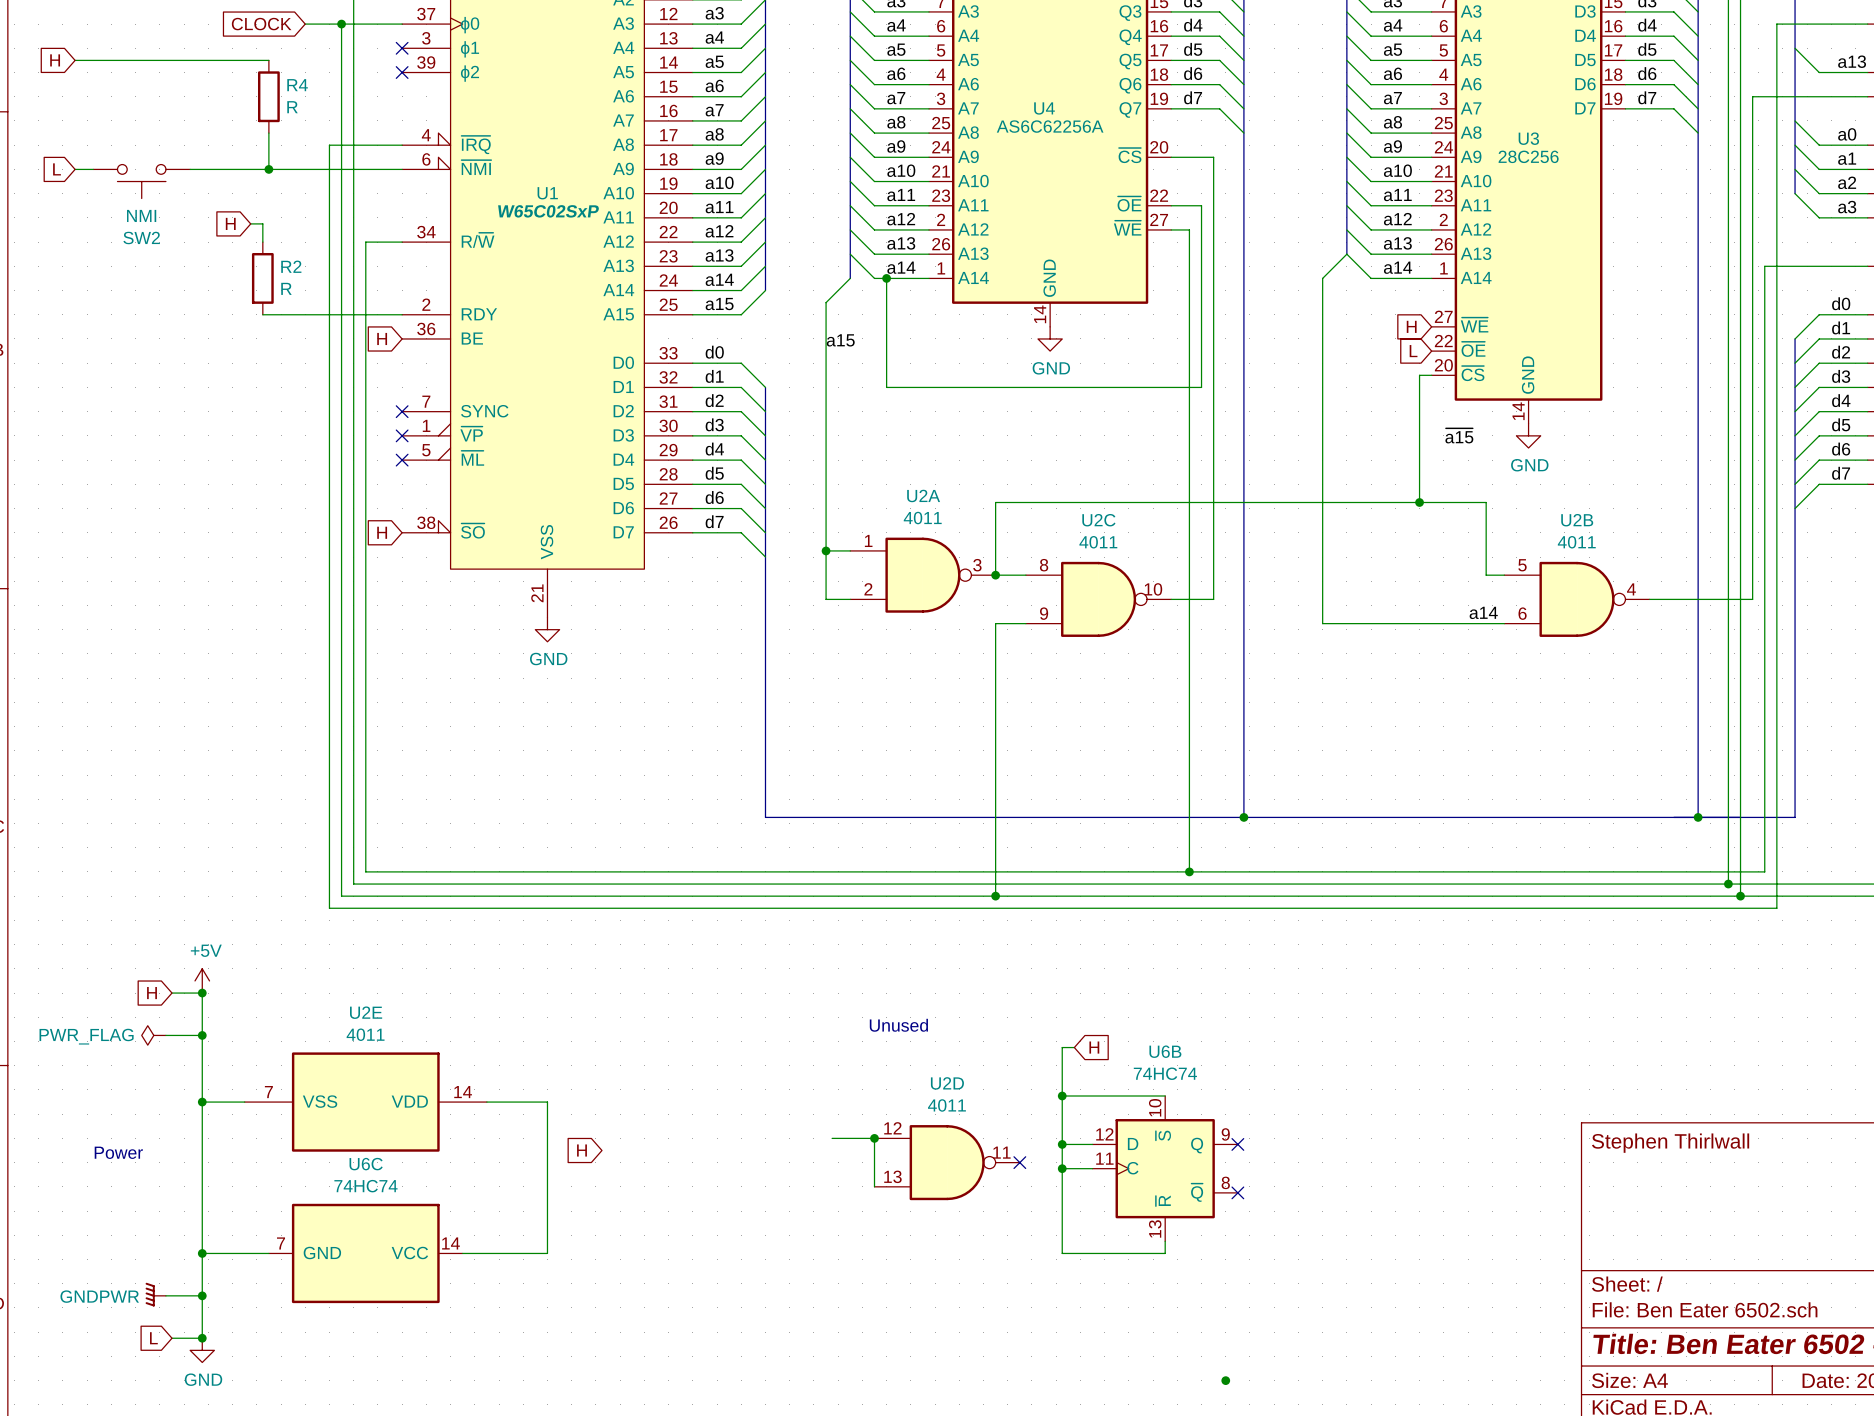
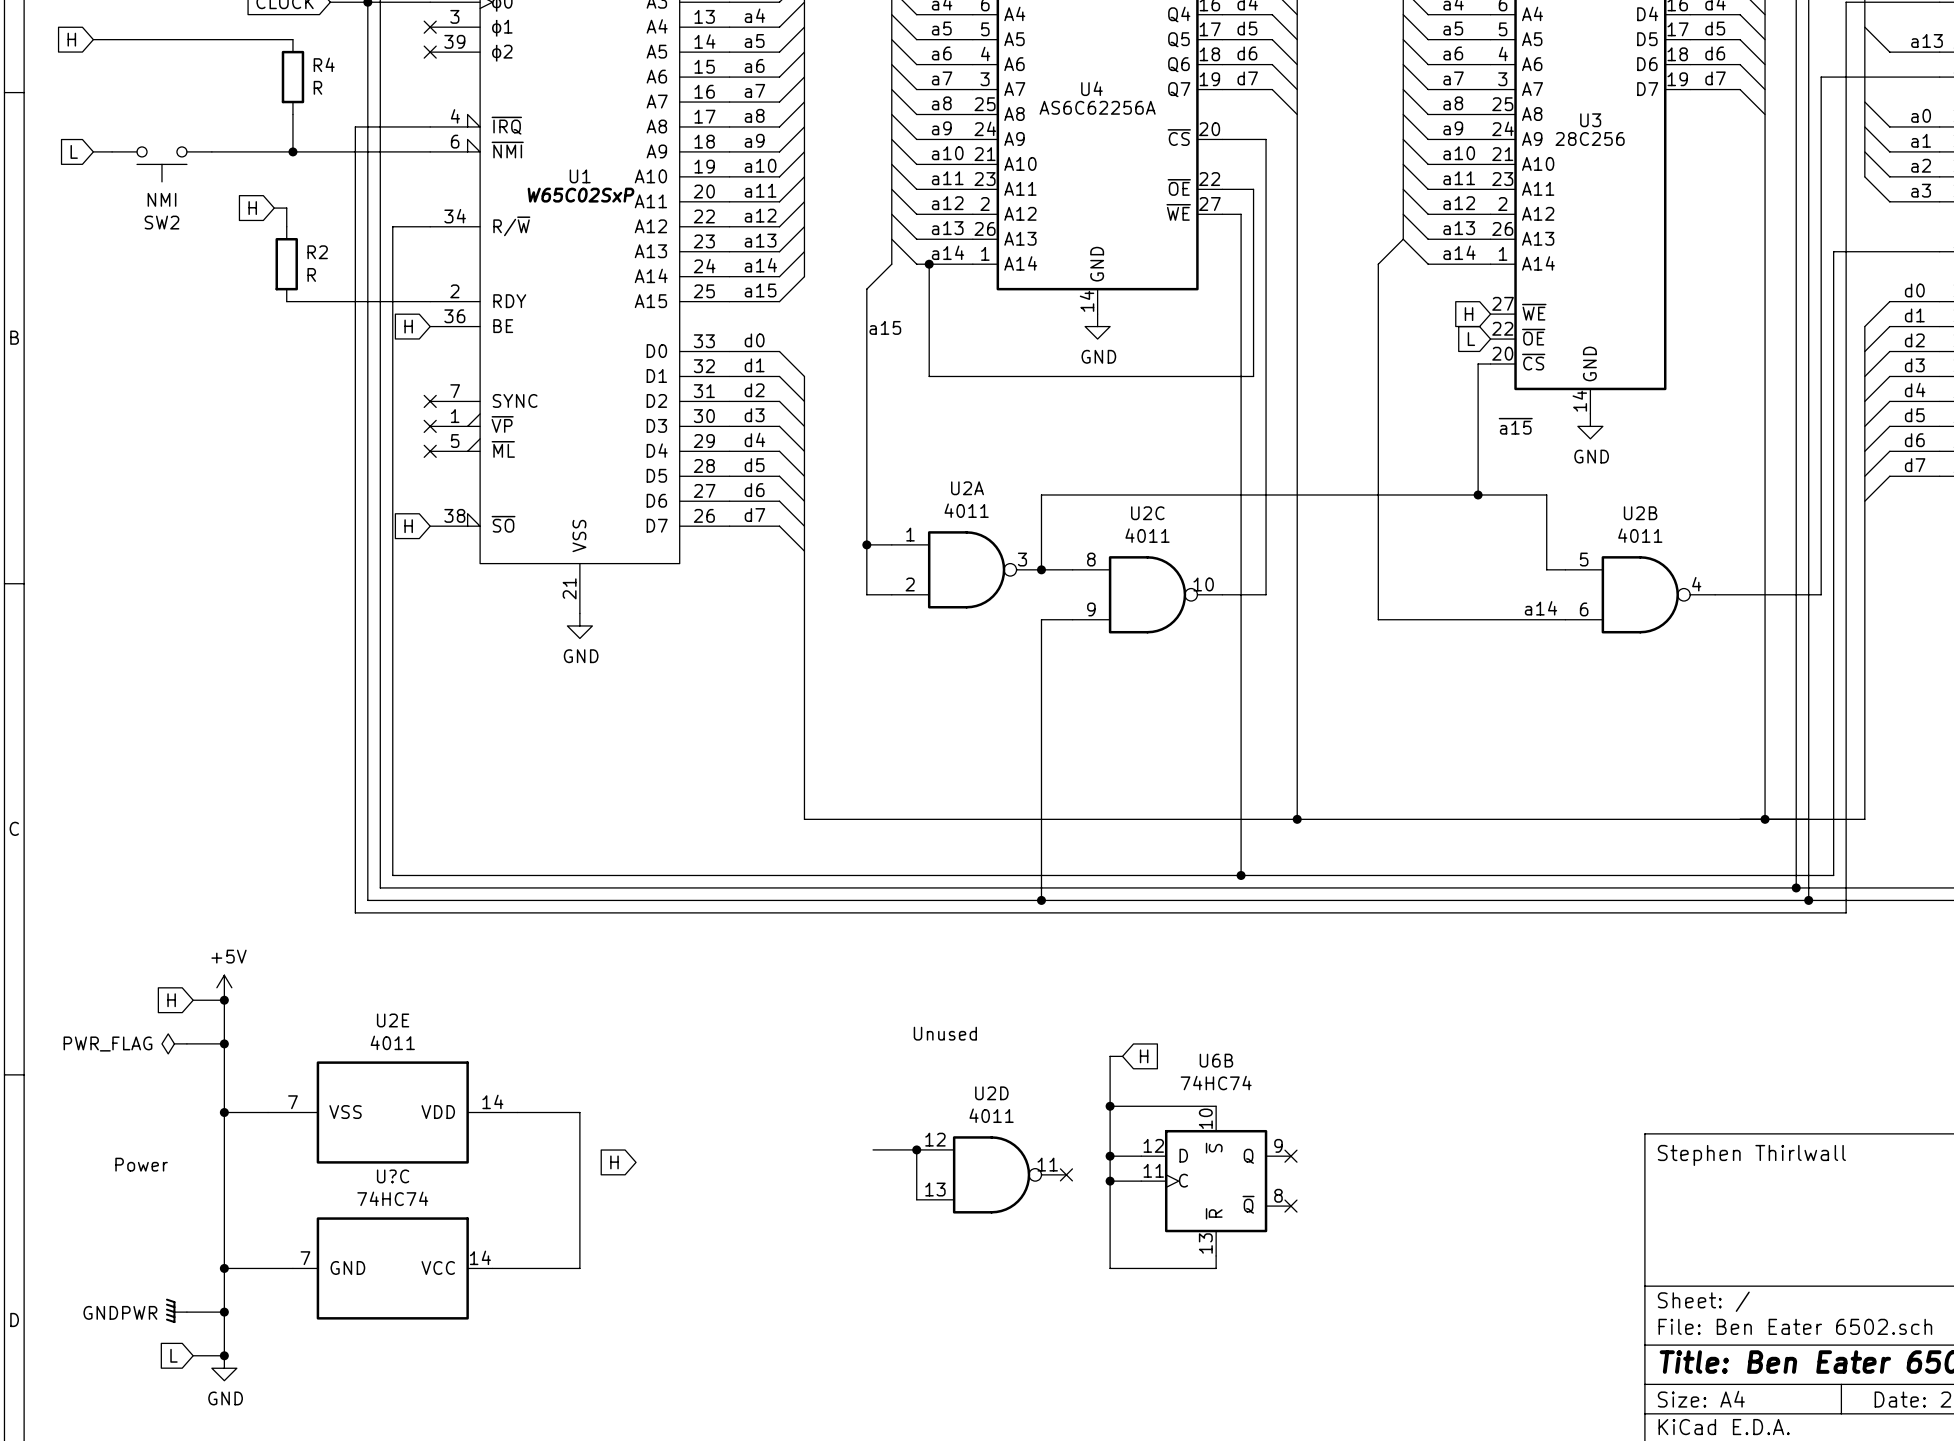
U6C name: U6C (366, 1164) -> U?C (393, 1176)
junction: (1225, 1380) -> none

